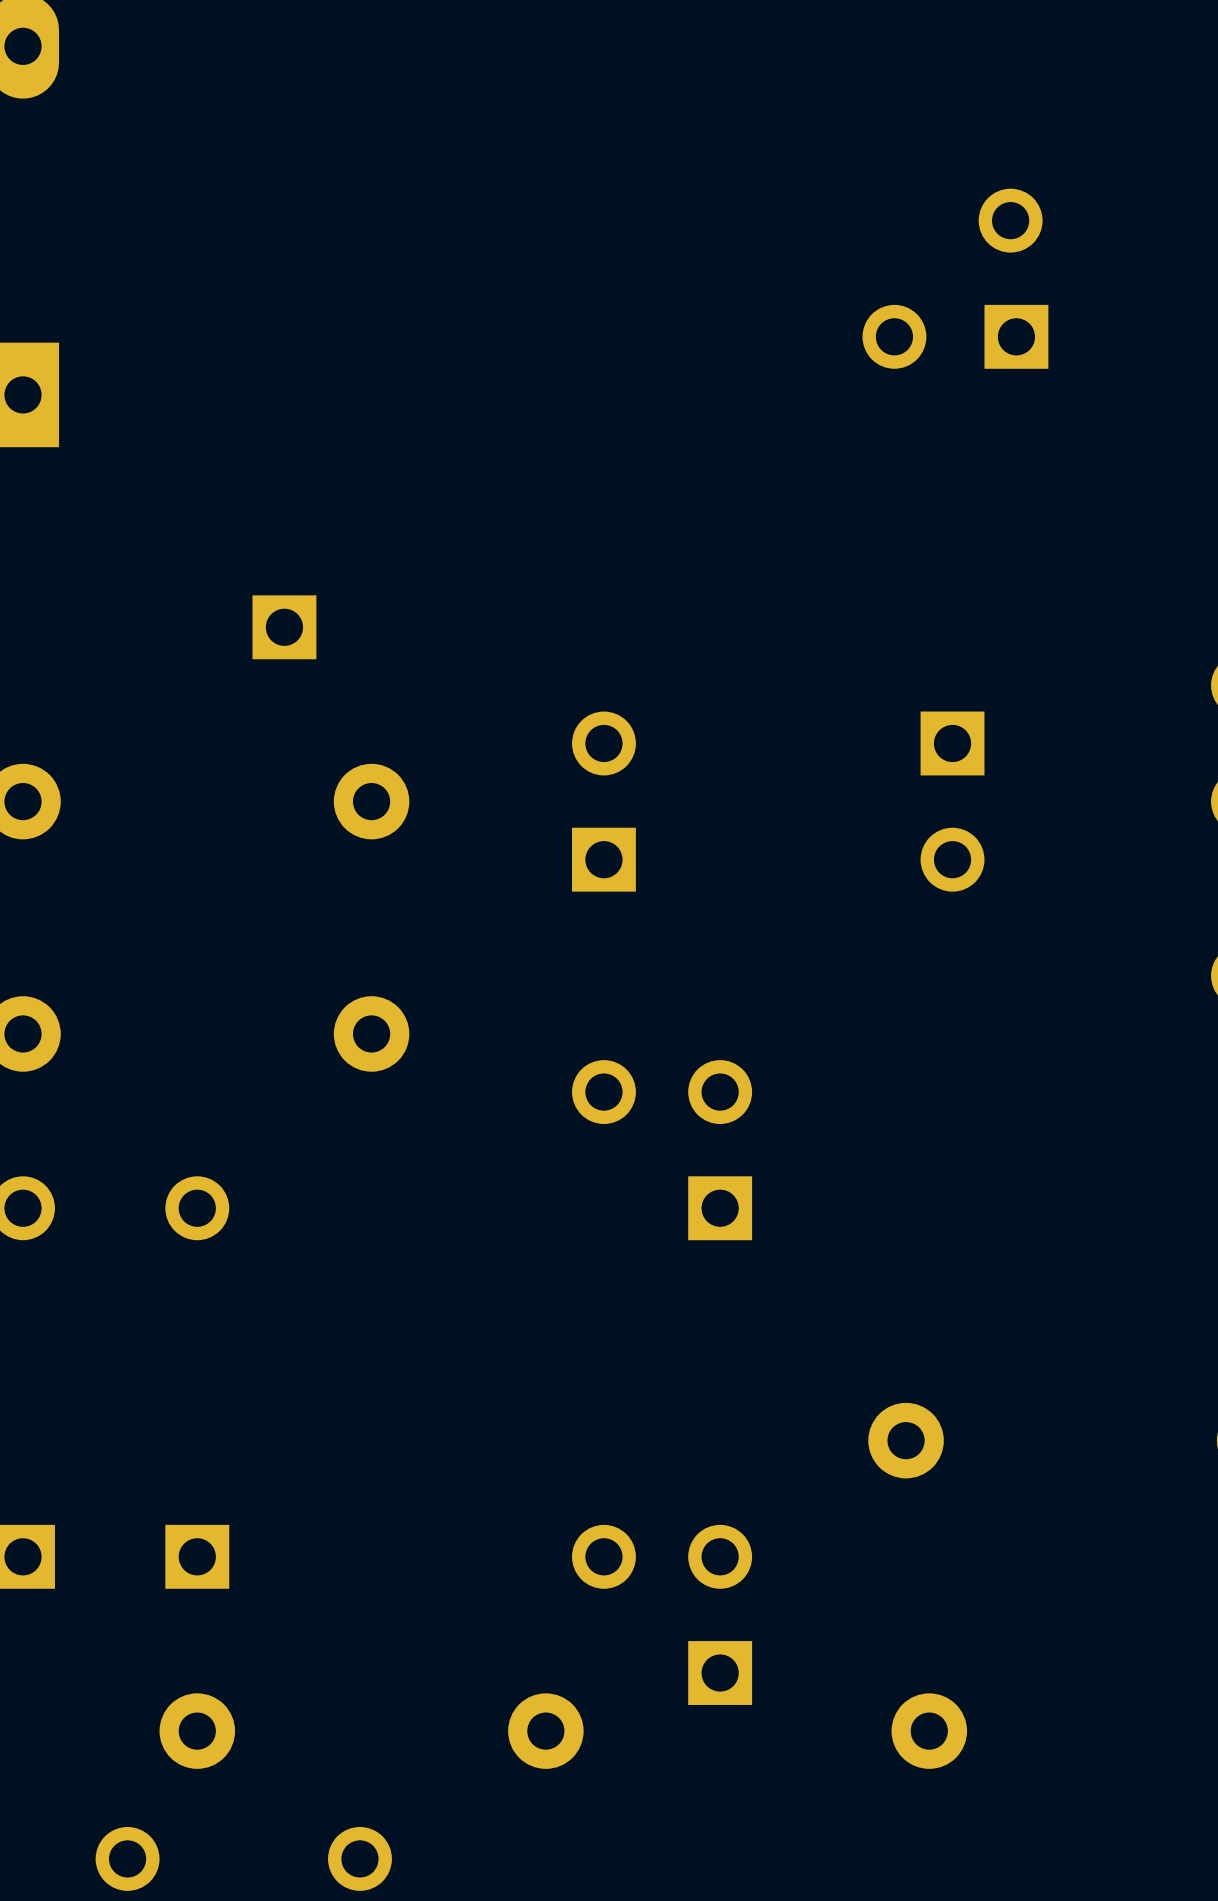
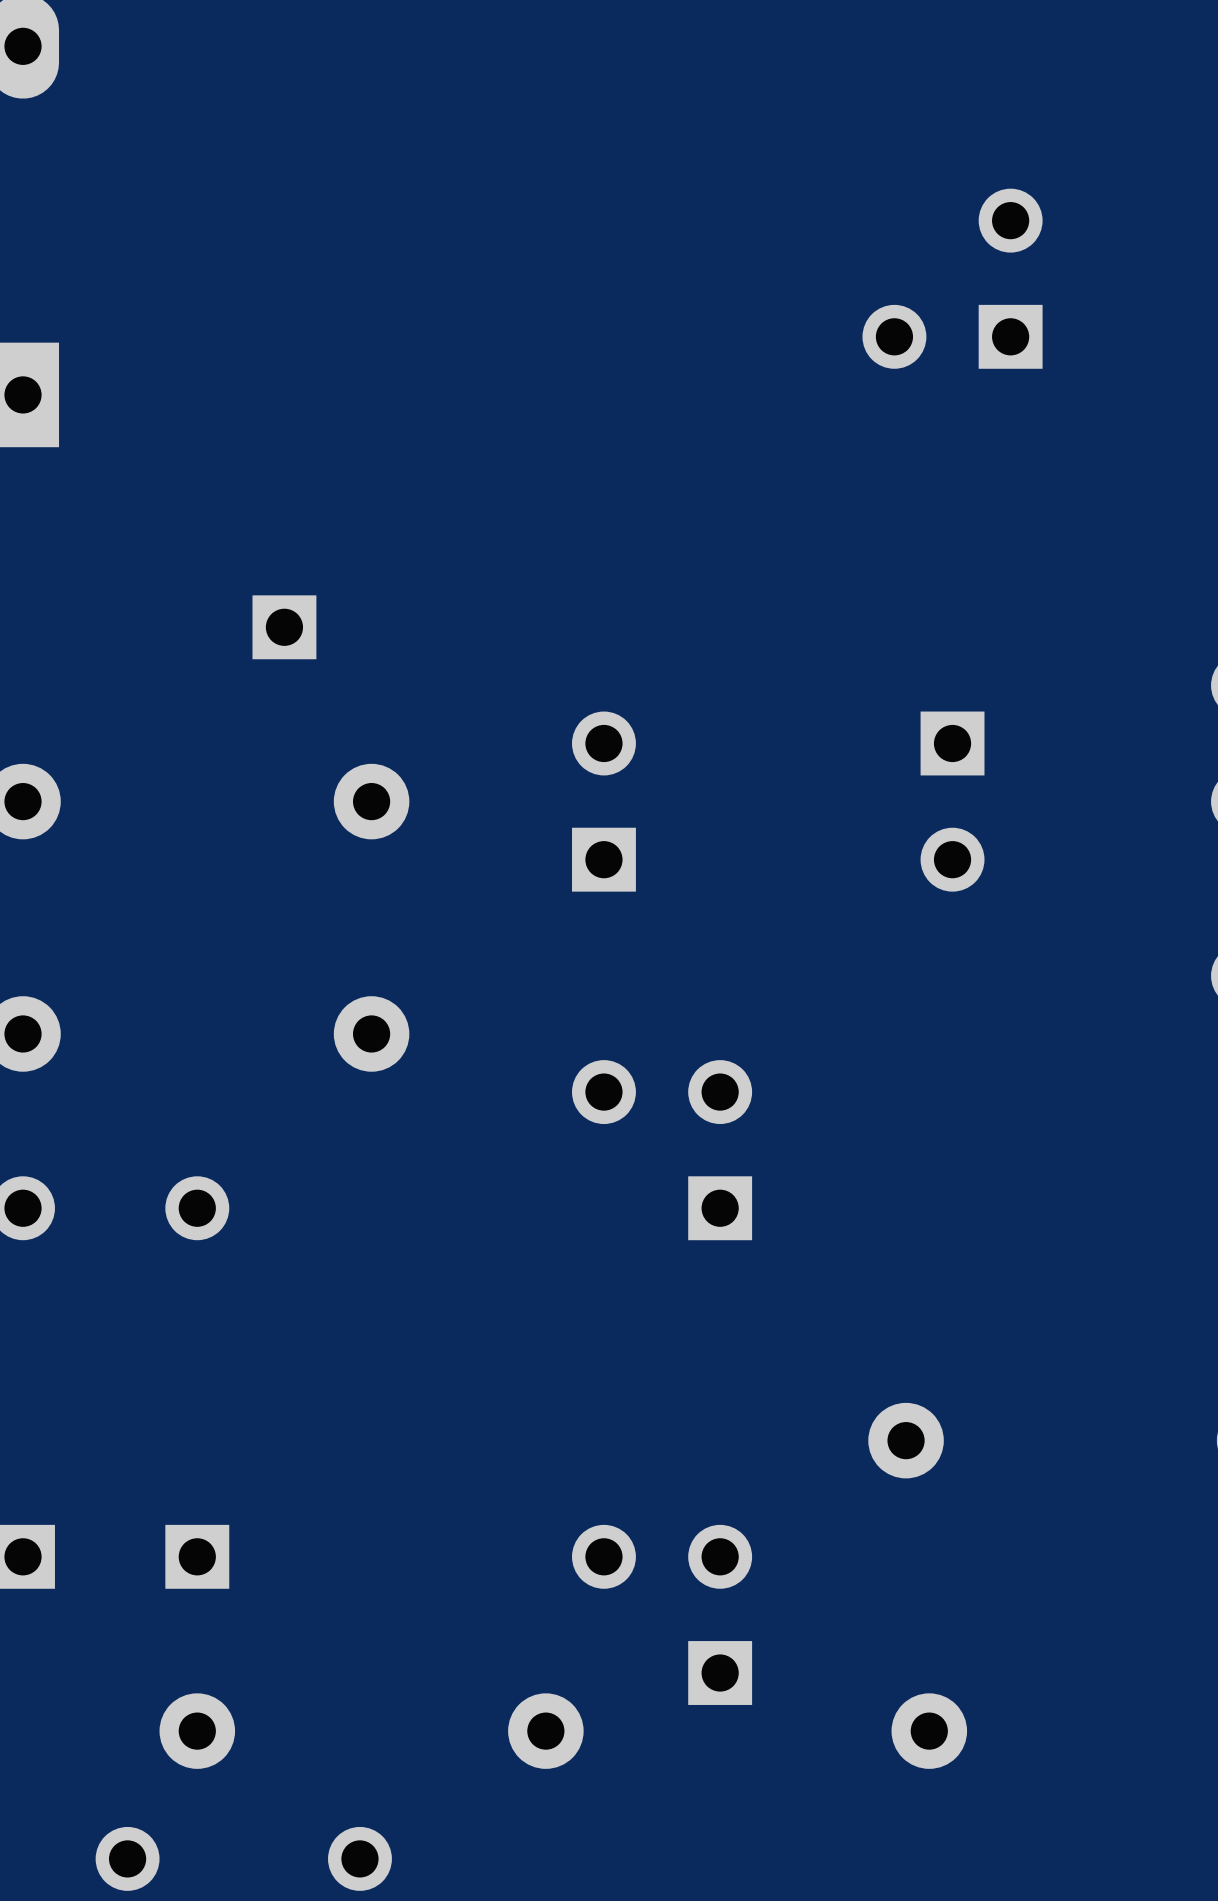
part footprint: [862, 188, 1049, 369] -> [862, 188, 1043, 369]

